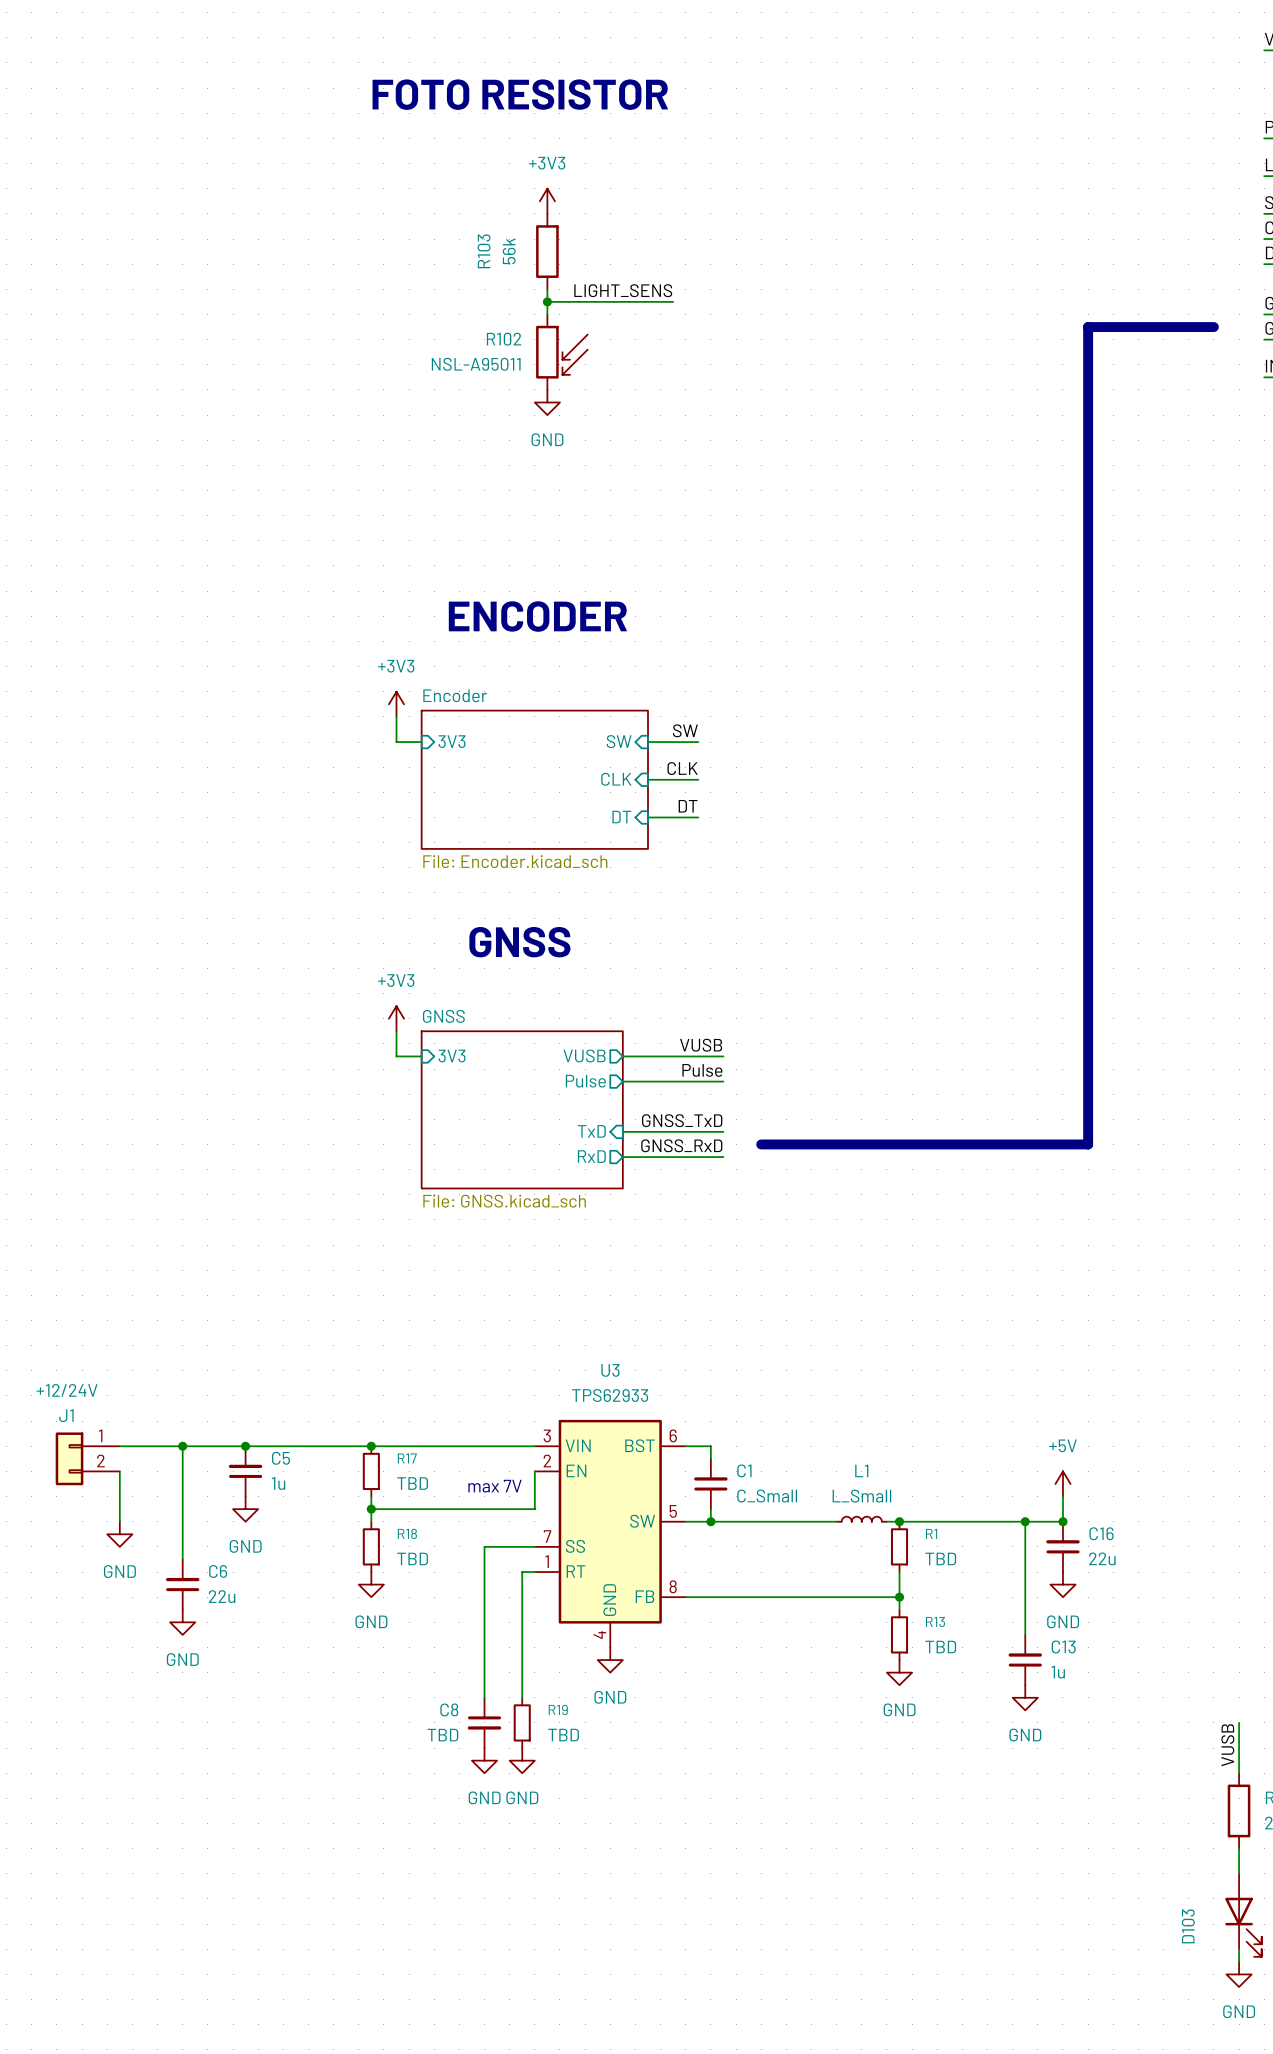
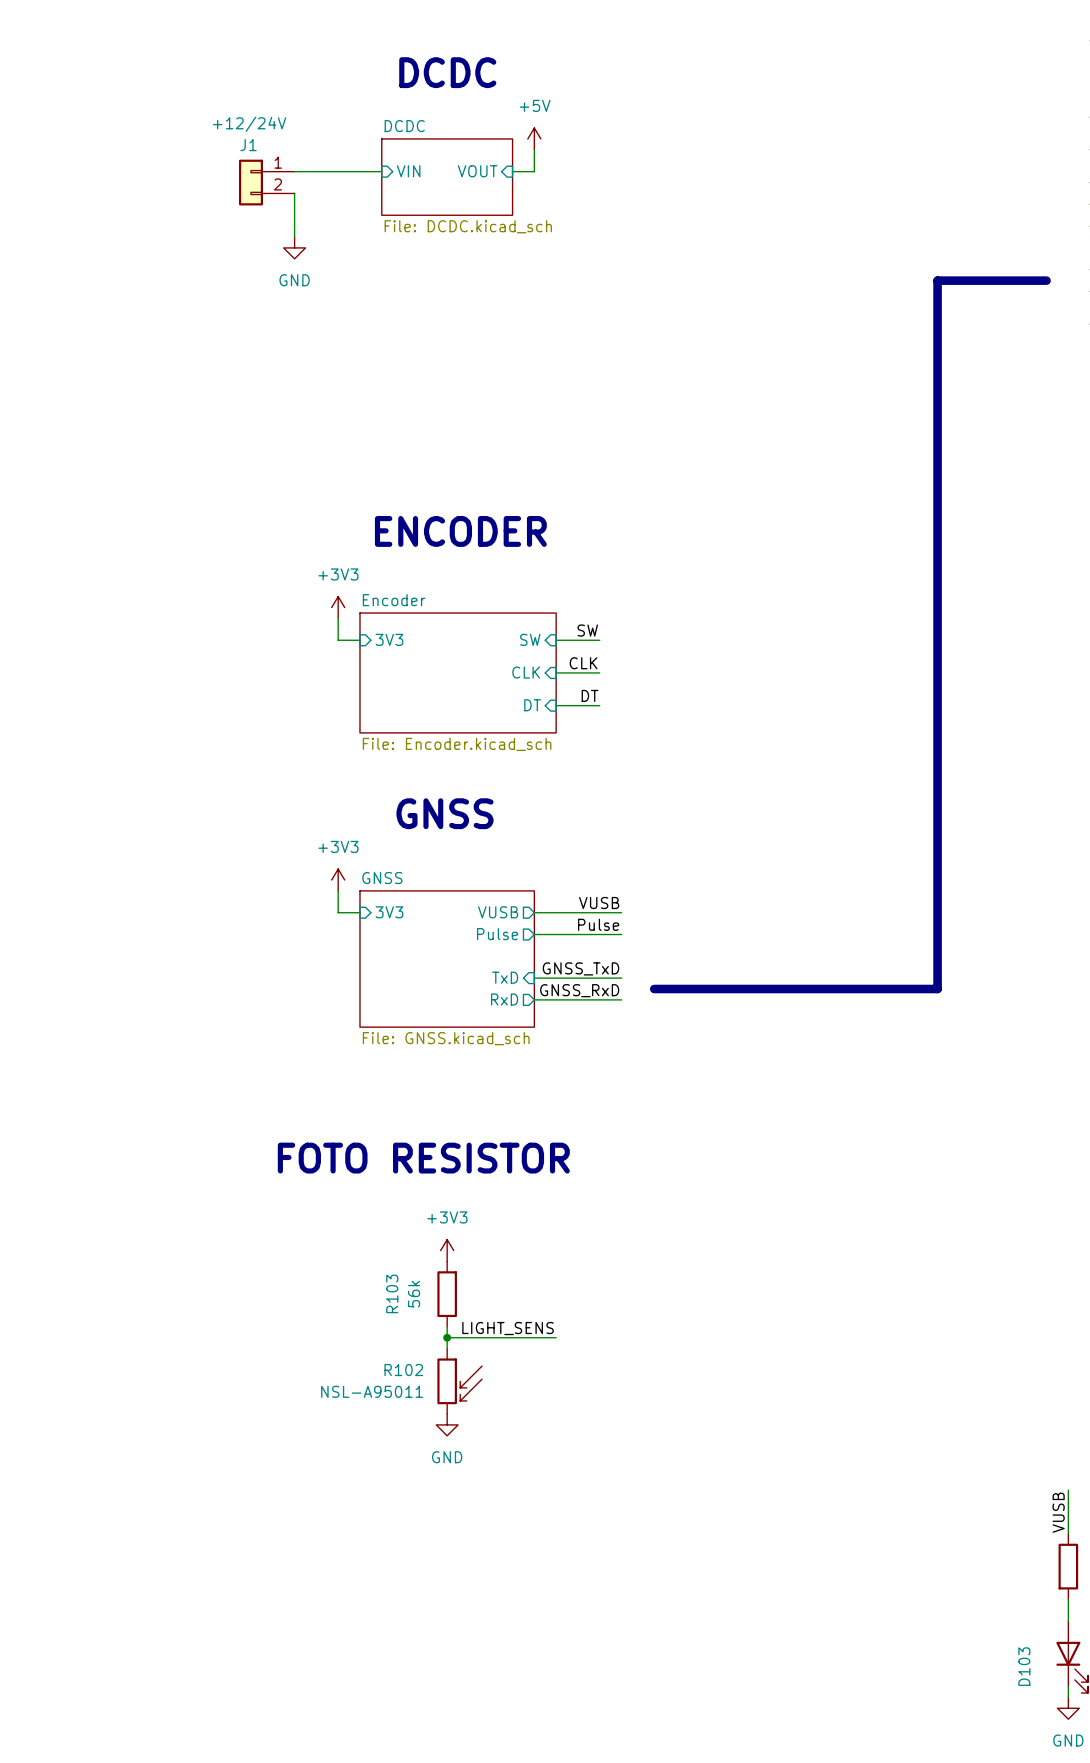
text: FOTO RESISTOR (520, 94) -> DCDC (447, 72)
power symbol: none -> +5V (534, 138)
wire: none -> (534, 149) (534, 171) (512, 171)
sheet pin: none -> VIN (408, 171)
sheet pin: none -> VOUT (477, 171)
wire: none -> (294, 171) (381, 171)
power symbol: +3V3 (547, 201) -> none
sheet DCDC: none -> File: DCDC.kicad_sch (447, 177)
wire: none -> (294, 193) (294, 237)
R103 position: (547, 251) -> (447, 1294)
wire: (547, 289) (547, 314) -> none
label: LIGHT_SENS (623, 290) -> none
wire: (547, 301) (673, 301) -> none
junction: (547, 301) -> none
R102 position: (561, 352) -> (459, 1381)
power symbol position: GND (547, 402) -> GND (294, 247)
text: none -> FOTO RESISTOR (423, 1158)
wire: (119, 1446) (534, 1446) -> none
wire: (182, 1446) (182, 1559) -> none
junction: (182, 1446) -> none
junction: (245, 1446) -> none
junction: (371, 1446) -> none
power symbol: none -> +3V3 (447, 1250)
wire: (685, 1446) (710, 1446) (710, 1458) -> none
J1 position: (87, 1458) -> (266, 182)
wire: (119, 1471) (119, 1521) -> none
C5: 1u (245, 1471) -> none
R17: TBD (371, 1471) -> none
wire: (534, 1471) (534, 1509) (371, 1509) -> none
C1: C_Small (710, 1483) -> none
power symbol: +5V (1062, 1483) -> none
text: max 7V (495, 1486) -> none
wire: (371, 1496) (371, 1521) -> (447, 1326) (447, 1348)
wire: (1062, 1496) (1062, 1521) (886, 1521) -> none
power symbol: GND (245, 1509) -> none
junction: (371, 1509) -> none
wire: (710, 1509) (710, 1521) -> none
L1: L_Small (861, 1519) -> none
wire: (685, 1521) (836, 1521) -> none
junction: (710, 1521) -> none
junction: (899, 1521) -> none
wire: (1025, 1521) (1025, 1634) -> none
junction: (1025, 1521) -> none
junction: (1062, 1521) -> none
U3: TPS62933 (610, 1533) -> none
power symbol: GND (119, 1534) -> none
label: none -> LIGHT_SENS (508, 1328)
R18: TBD (371, 1546) -> none
wire: (522, 1546) (484, 1546) (484, 1697) -> none
junction: none -> (447, 1337)
R1: TBD (899, 1546) -> none
C16: 22u (1062, 1546) -> none
wire: (534, 1572) (522, 1572) (522, 1697) -> none
wire: (899, 1572) (899, 1609) -> none
C6: 22u (182, 1584) -> none
power symbol: GND (371, 1584) -> none
power symbol: GND (1062, 1584) -> none
wire: (685, 1597) (899, 1597) -> none
junction: (899, 1597) -> none
power symbol: GND (182, 1622) -> none
R13: TBD (899, 1634) -> none
power symbol: none -> GND (447, 1424)
power symbol: GND (610, 1660) -> none
C13: 1u (1025, 1660) -> none
power symbol: GND (899, 1672) -> none
power symbol: GND (1025, 1697) -> none
C8: TBD (484, 1722) -> none
R19: TBD (522, 1722) -> none
power symbol: GND (484, 1760) -> none
power symbol: GND (522, 1760) -> none

